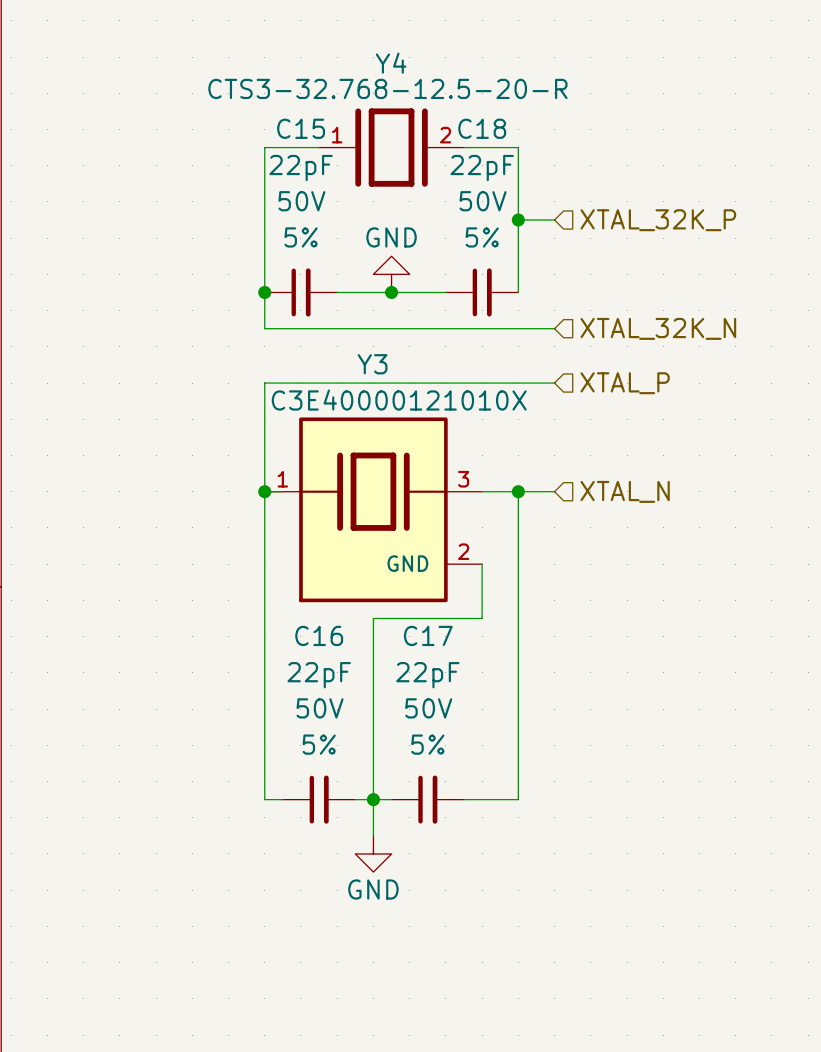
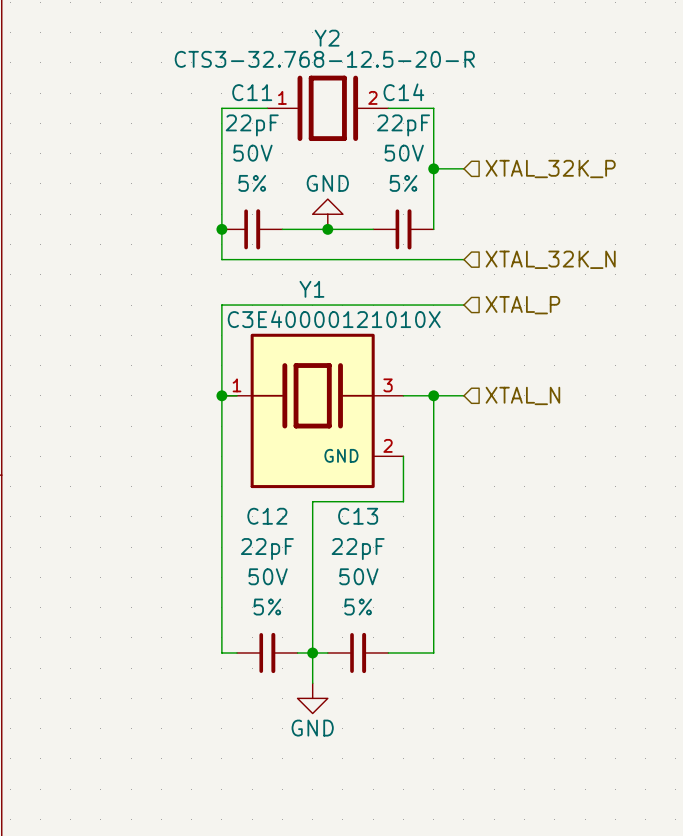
Y4 name: Y4 (391, 63) -> Y2 (327, 38)
C15 name: C15 (301, 128) -> C11 (252, 92)
C18 name: C18 (482, 128) -> C14 (403, 92)
Y3 name: Y3 (372, 364) -> Y1 (311, 289)
C16 name: C16 (319, 635) -> C12 (267, 516)
C17 name: C17 (428, 635) -> C13 (358, 516)

